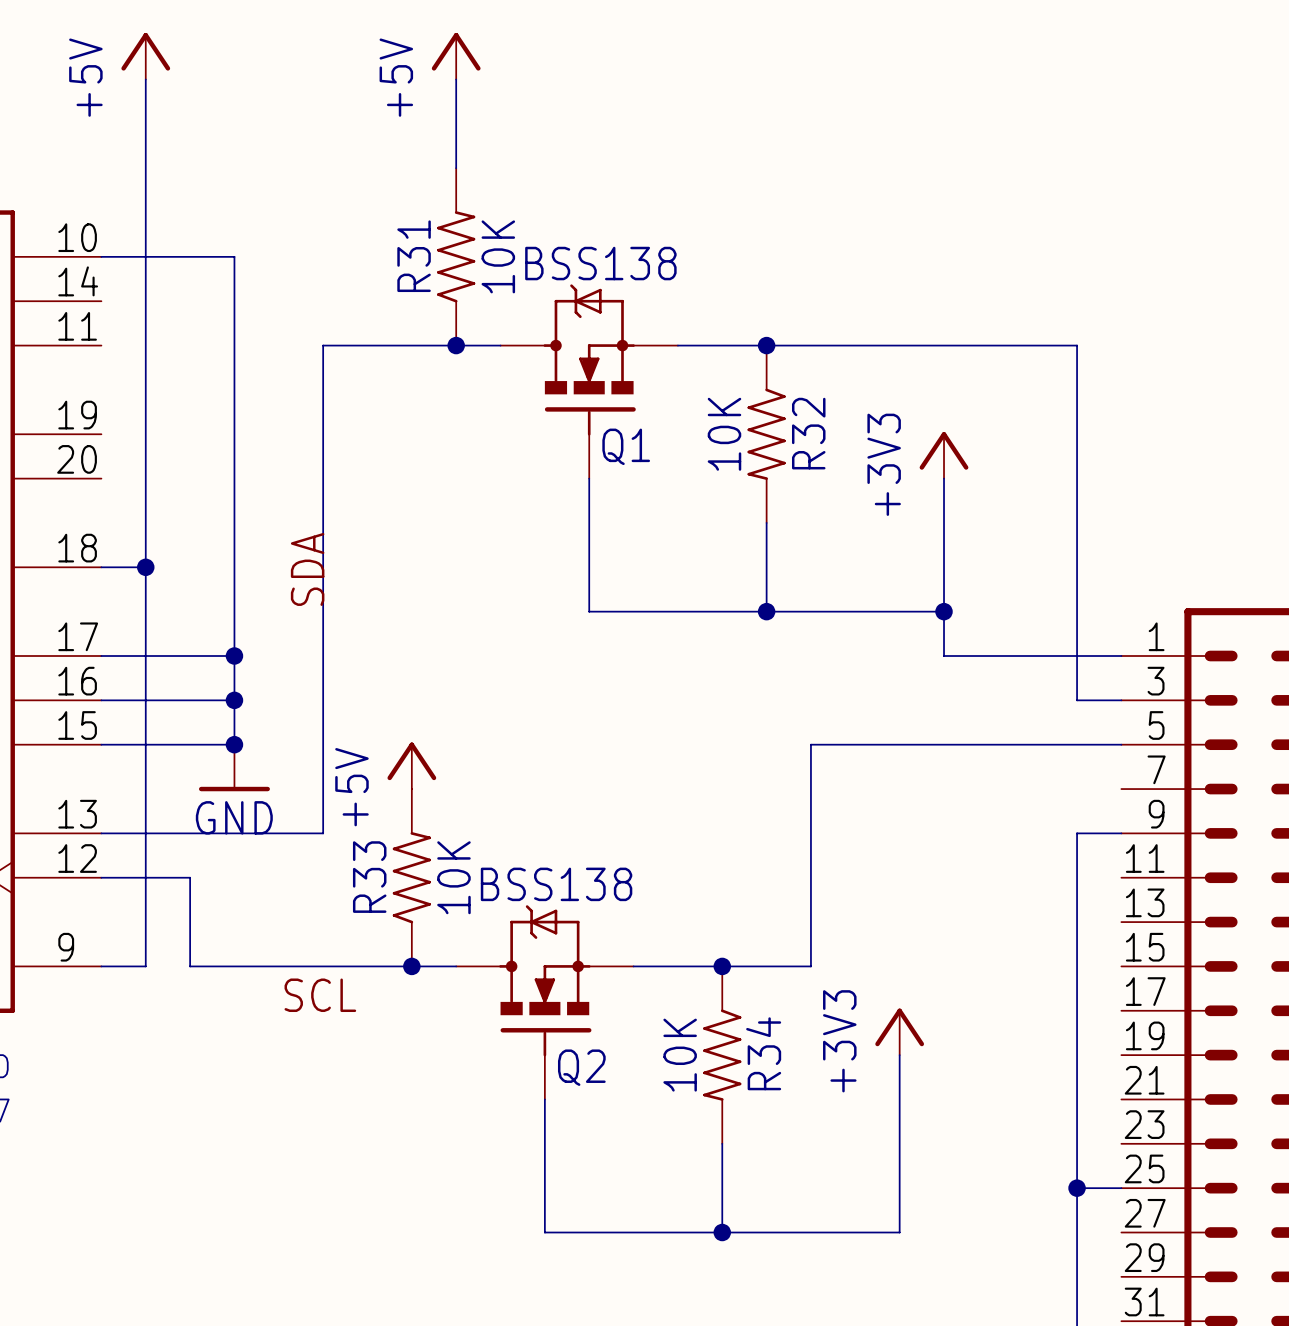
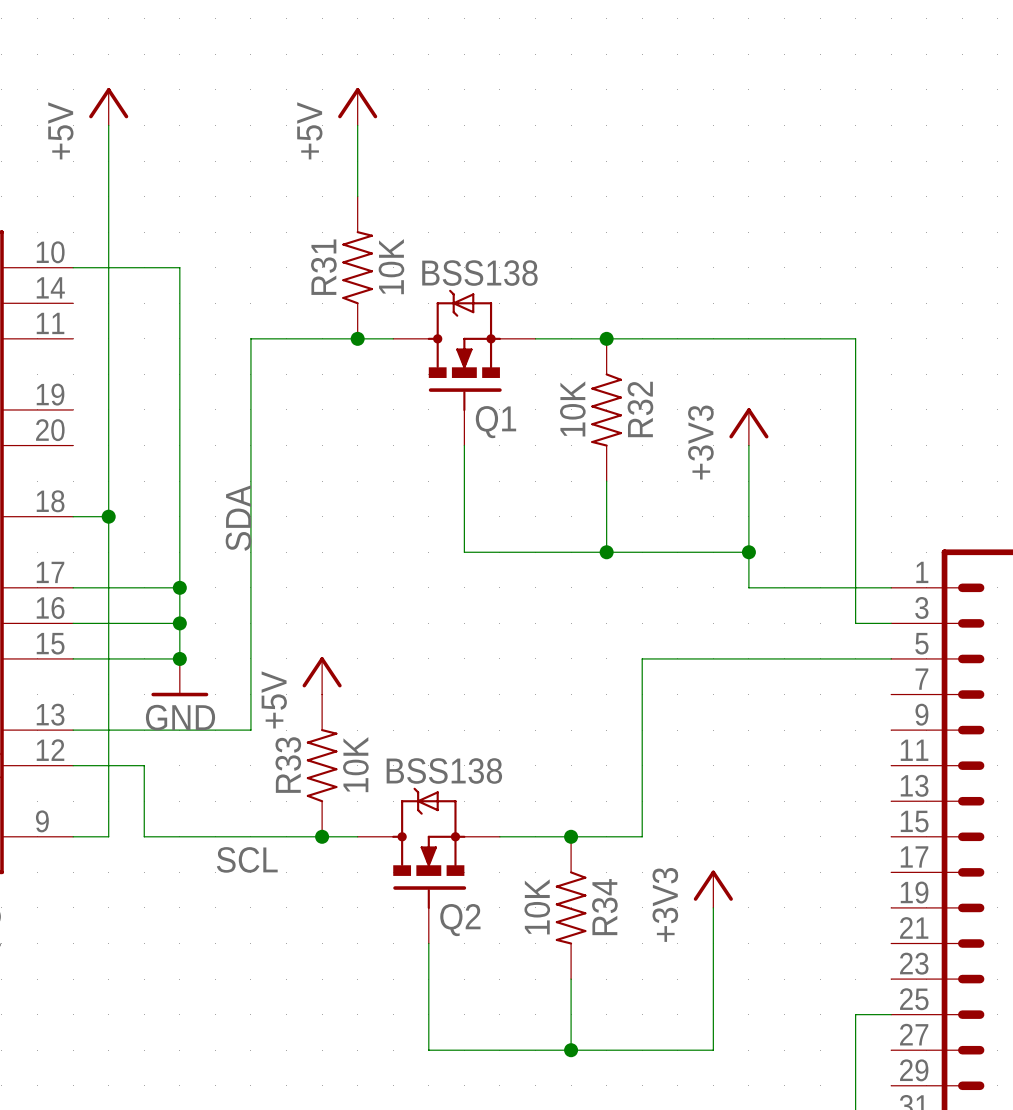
wire: (1121, 833) (1077, 833) (1077, 1188) -> none
junction: (1077, 1188) -> none

